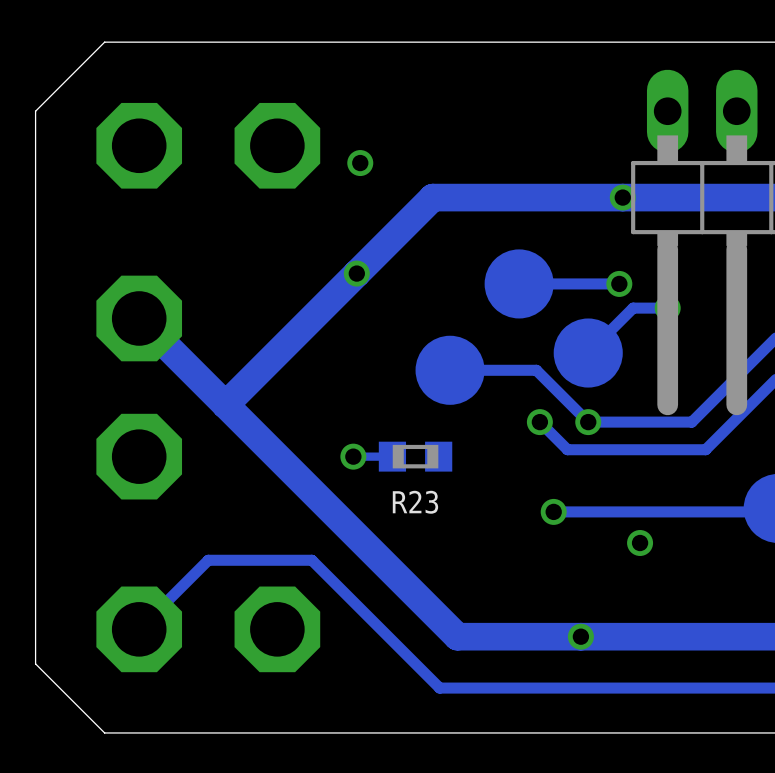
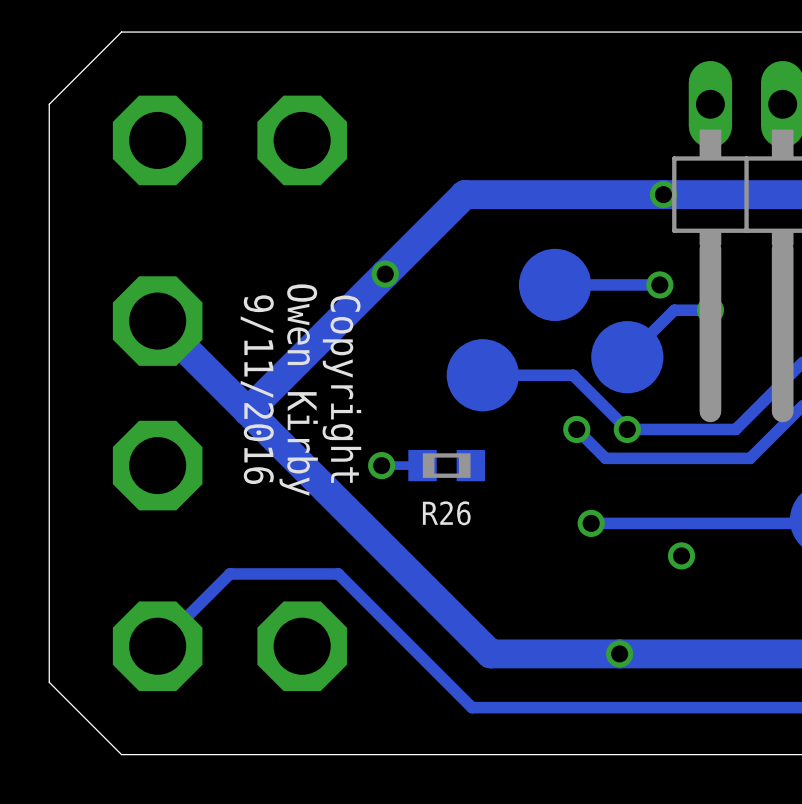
via: (360, 163) -> none
text: none -> Copyright (341, 389)
text: none -> 9/11/2016 (257, 389)
text: none -> Owen Kirby (298, 390)
R23 name: R23 (415, 502) -> R26 (446, 513)

